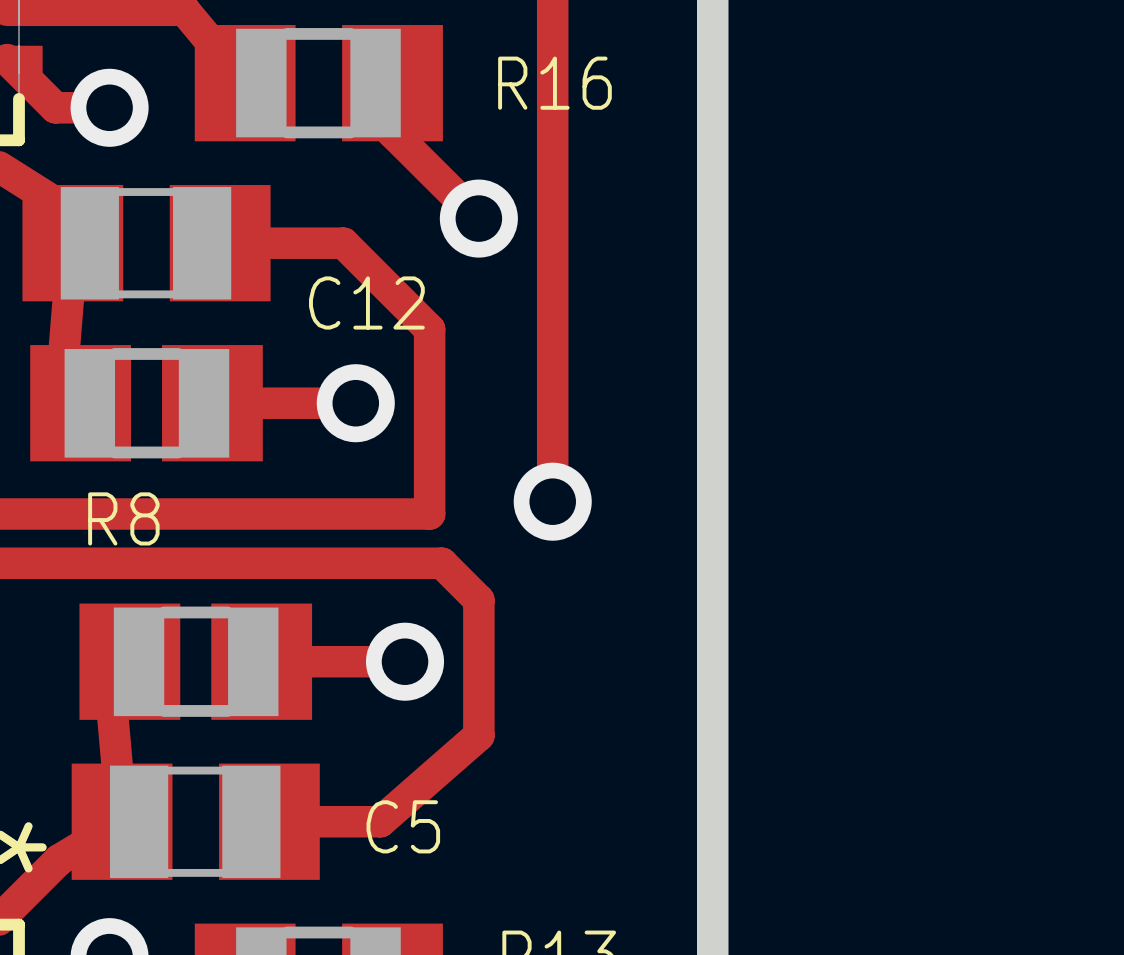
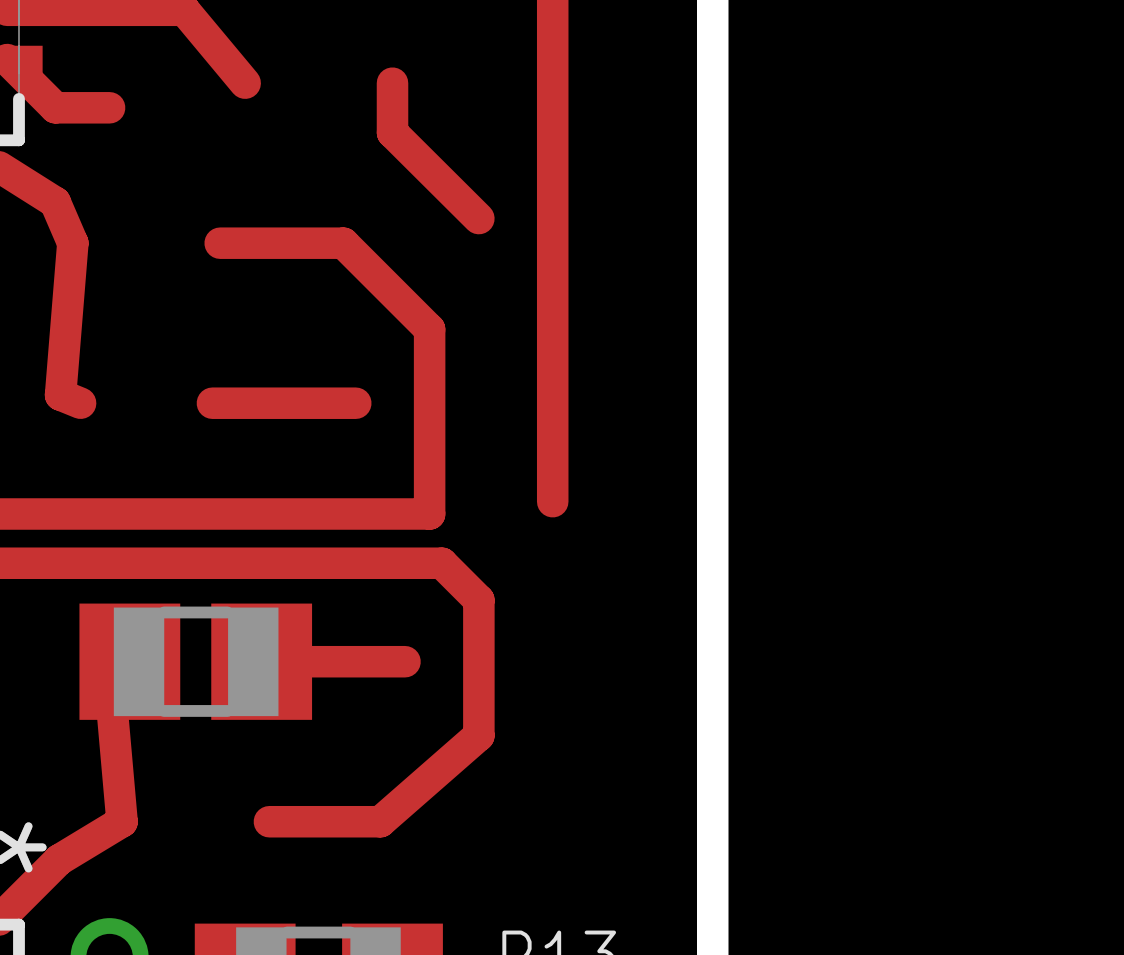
R16: (318, 83) -> none
via: (109, 107) -> none
via: (478, 218) -> none
C12: (146, 243) -> none
R8: (146, 403) -> none
via: (355, 403) -> none
via: (552, 501) -> none
via: (405, 661) -> none
C5: (195, 821) -> none

